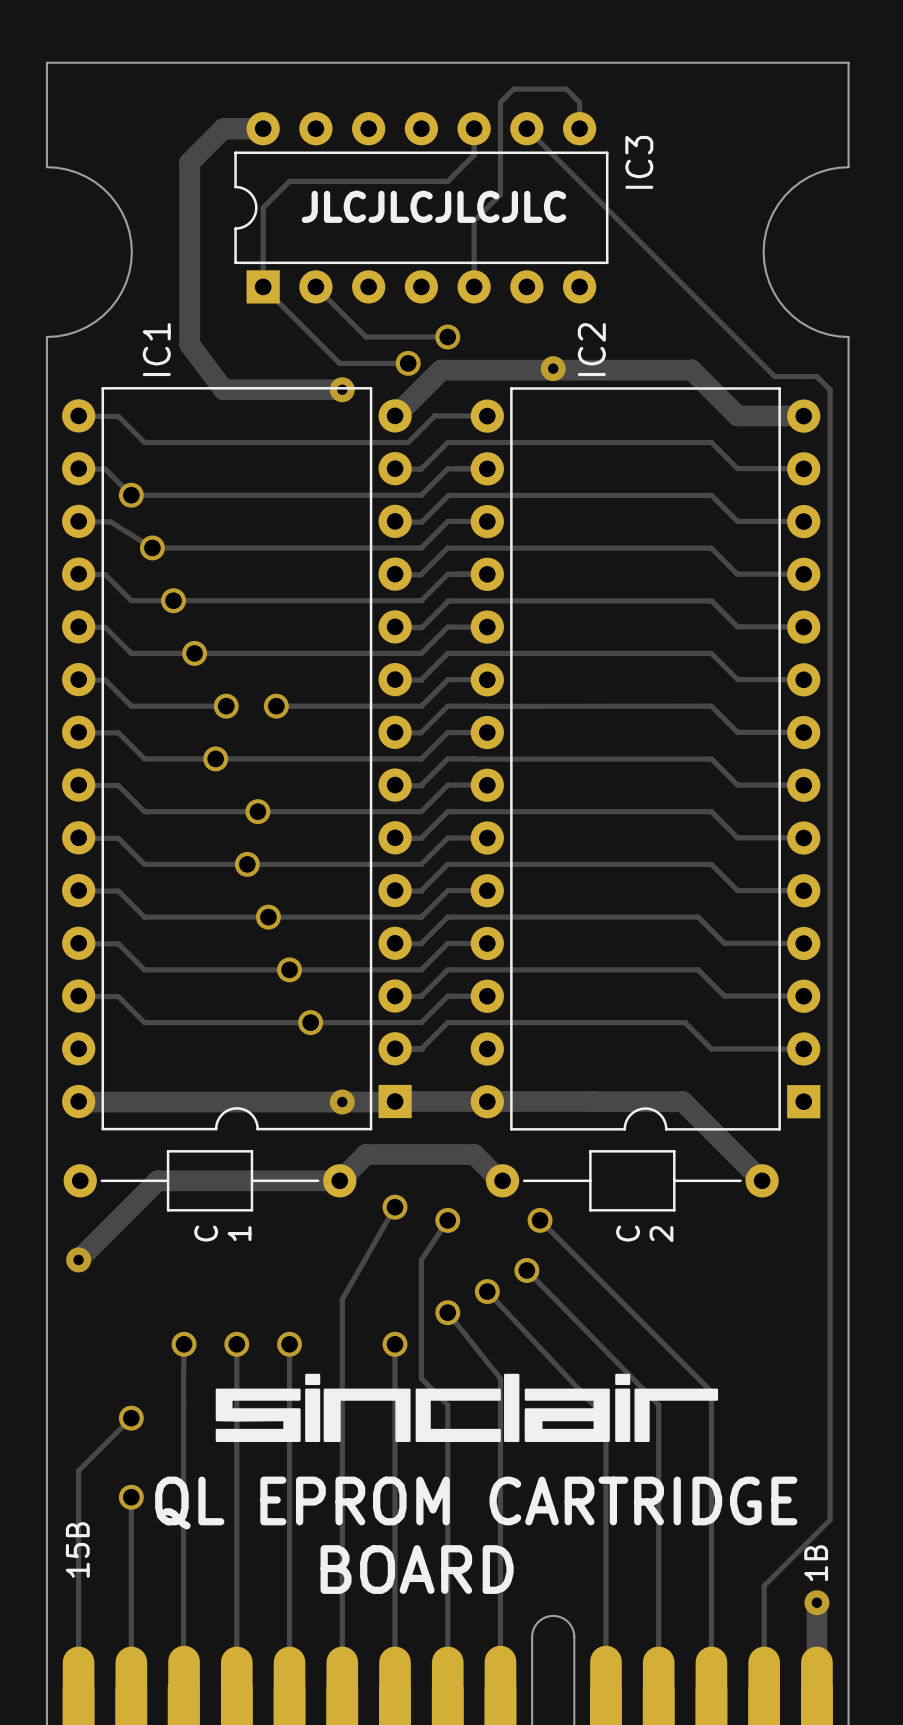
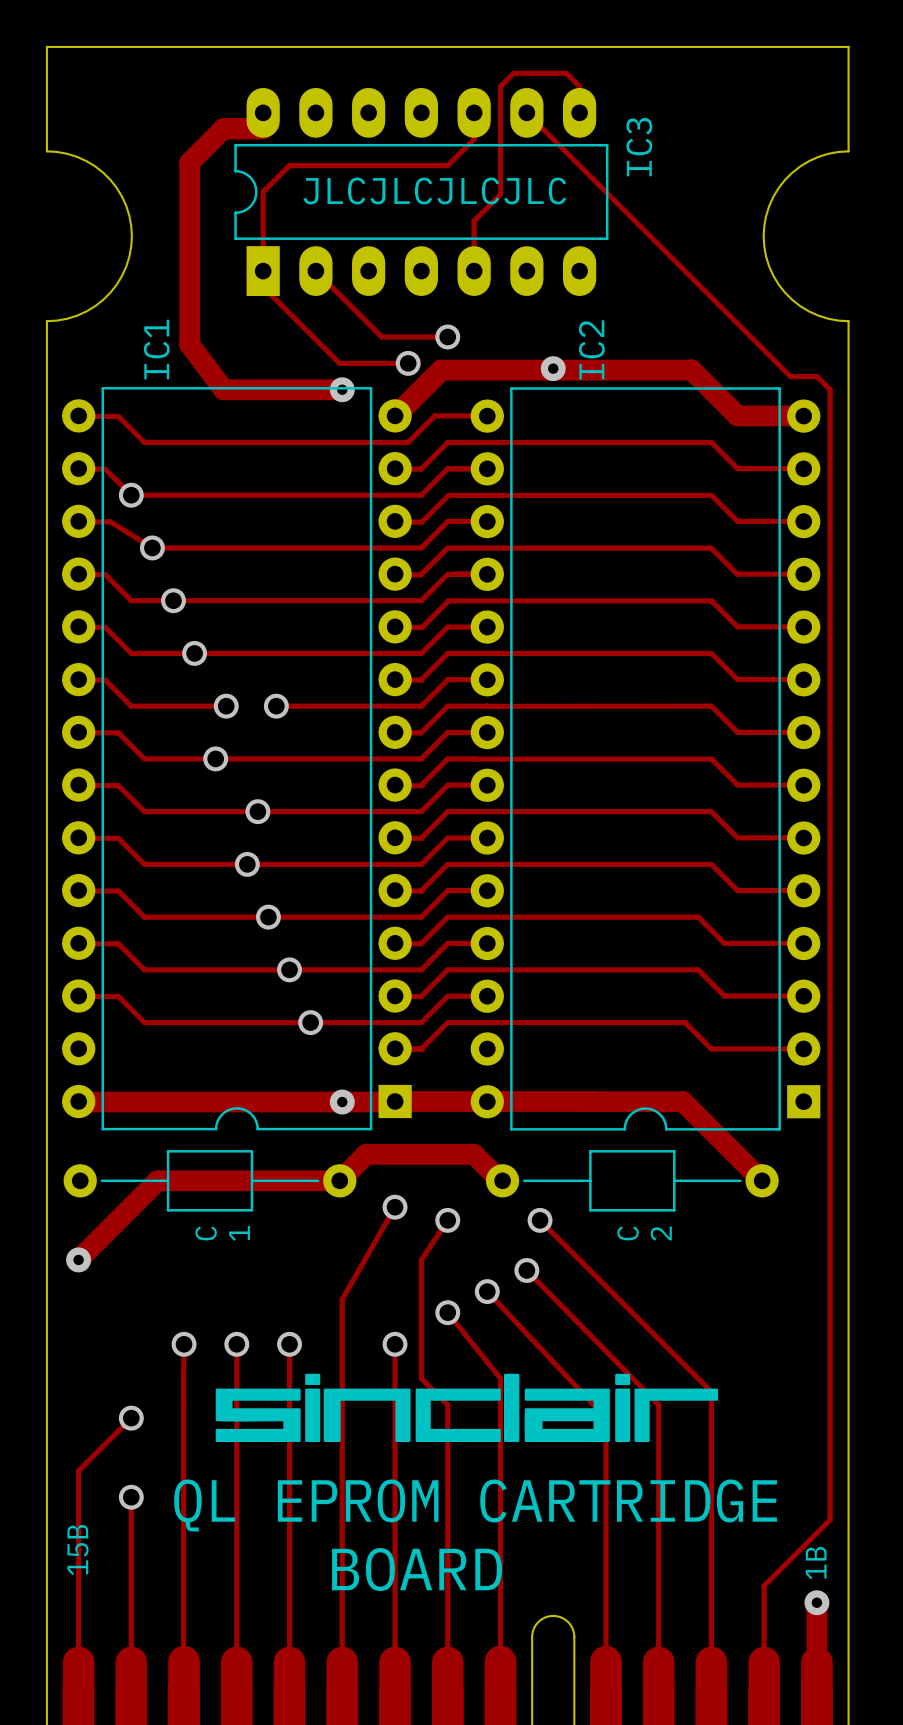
board edge: (46, 62) (848, 62) -> (46, 62) (46, 46) (848, 46) (848, 62)
track: (500, 102) (513, 89) (566, 89) (579, 102) -> (500, 102) (500, 86) (513, 73) (566, 73) (579, 86) (579, 102)
part footprint: [234, 112, 609, 304] -> [234, 87, 609, 296]
track: (526, 128) (774, 376) (790, 376) -> (526, 112) (790, 376)
track: (474, 139) (474, 155) (447, 181) (289, 181) (263, 207) -> (474, 139) (447, 165) (289, 165) (263, 191) (263, 207)
board edge: (46, 151) (46, 167) (77, 172) (95, 182) (110, 195) (126, 221) (131, 252) (129, 272) (122, 291) (103, 315) (77, 331) (46, 337) -> (46, 151) (67, 153) (86, 161) (110, 179) (126, 206) (131, 236) (126, 266) (110, 292) (86, 311) (67, 318) (46, 321) (46, 337)
board edge: (848, 151) (848, 167) (828, 169) (809, 176) (785, 195) (769, 221) (763, 252) (769, 282) (785, 308) (800, 322) (818, 331) (848, 337) -> (848, 151) (828, 153) (809, 161) (785, 179) (769, 206) (763, 236) (769, 266) (785, 292) (809, 311) (828, 318) (848, 321) (848, 337)
text position: IC3 (639, 162) -> IC3 (639, 147)
text position: JLCJLCJLCJLC (433, 206) -> JLCJLCJLCJLC (434, 191)
track: (315, 286) (366, 337) (381, 337) -> (315, 271) (381, 337)

